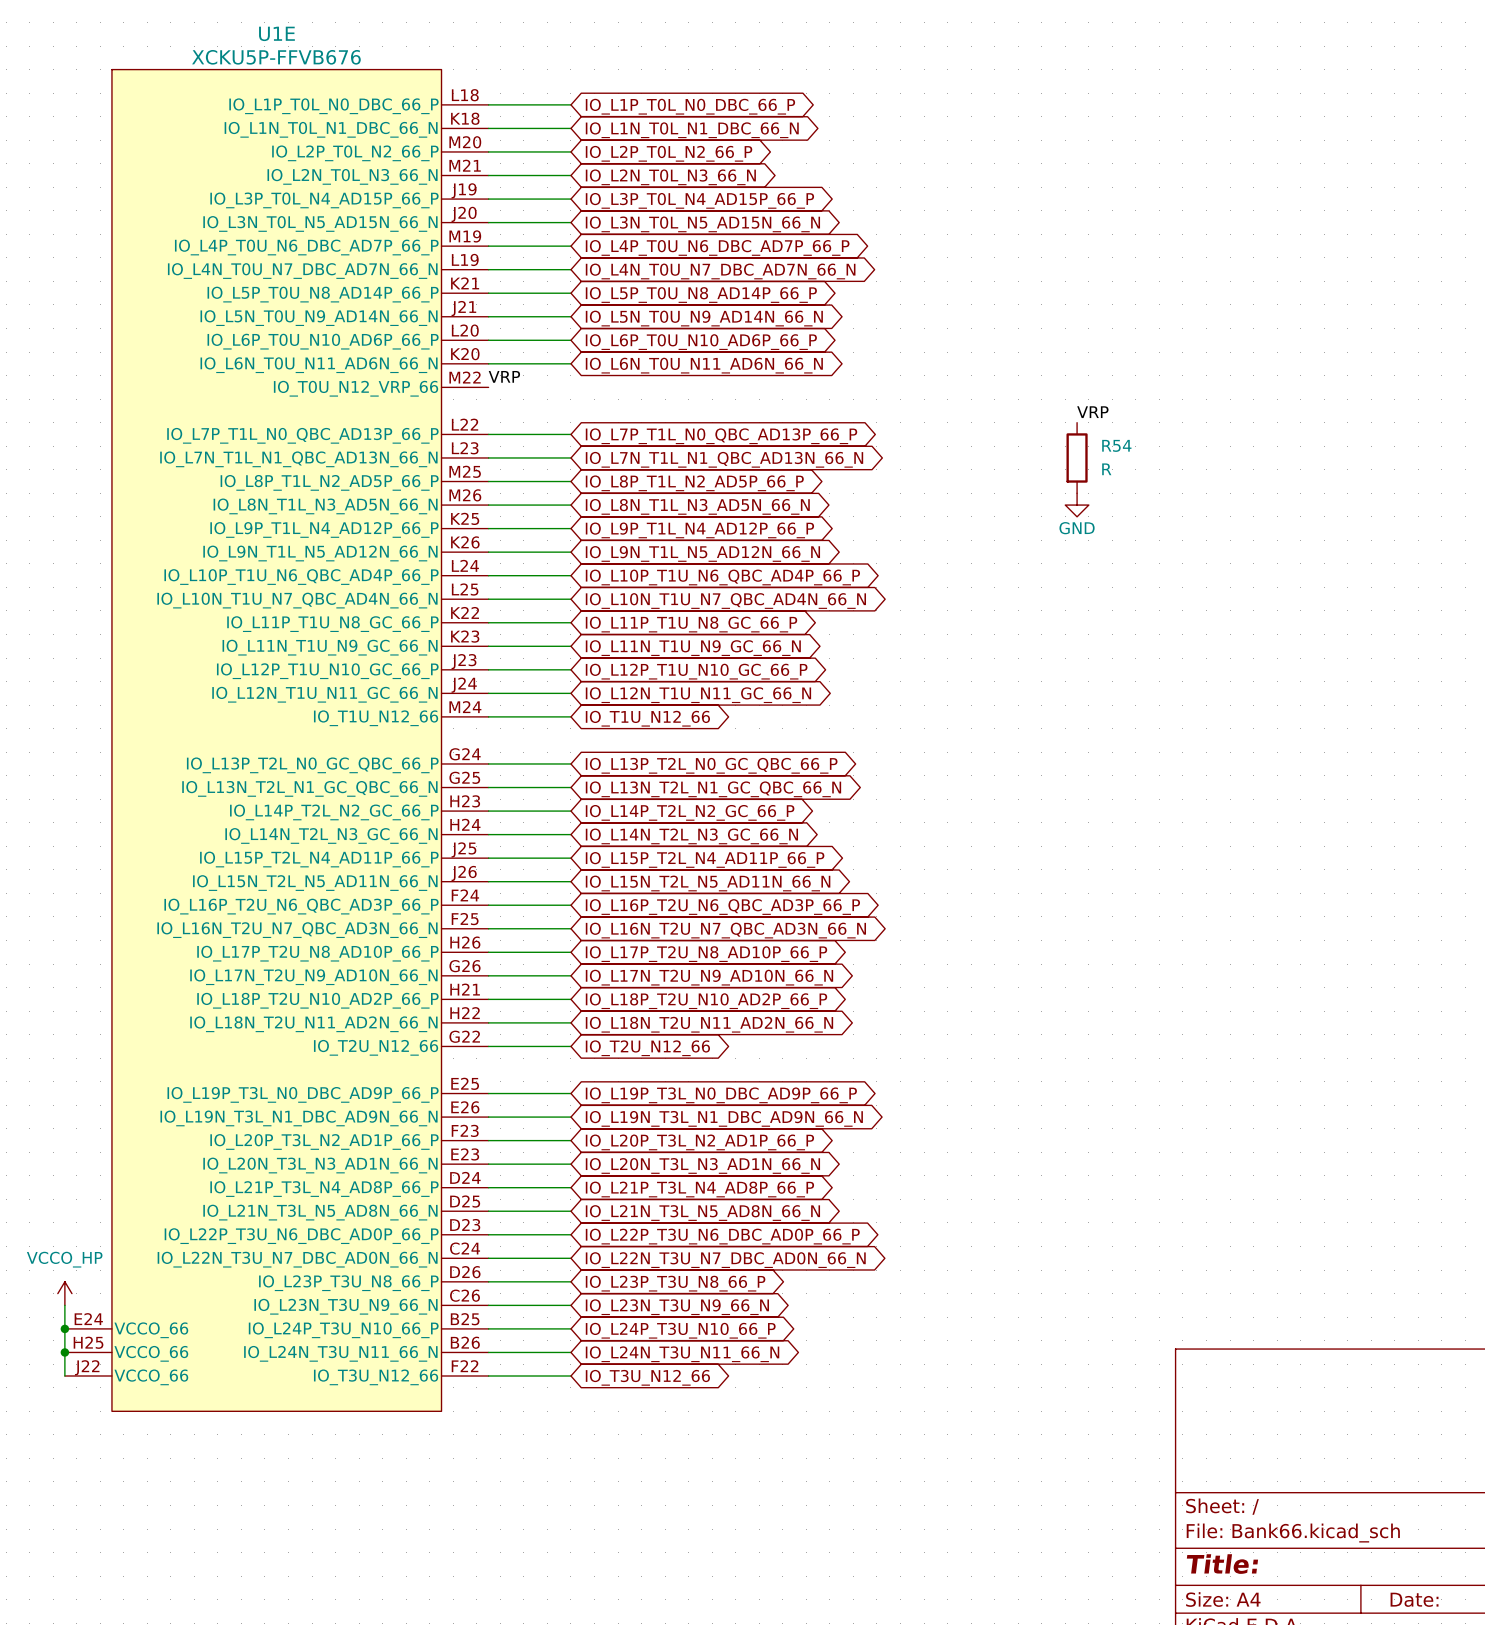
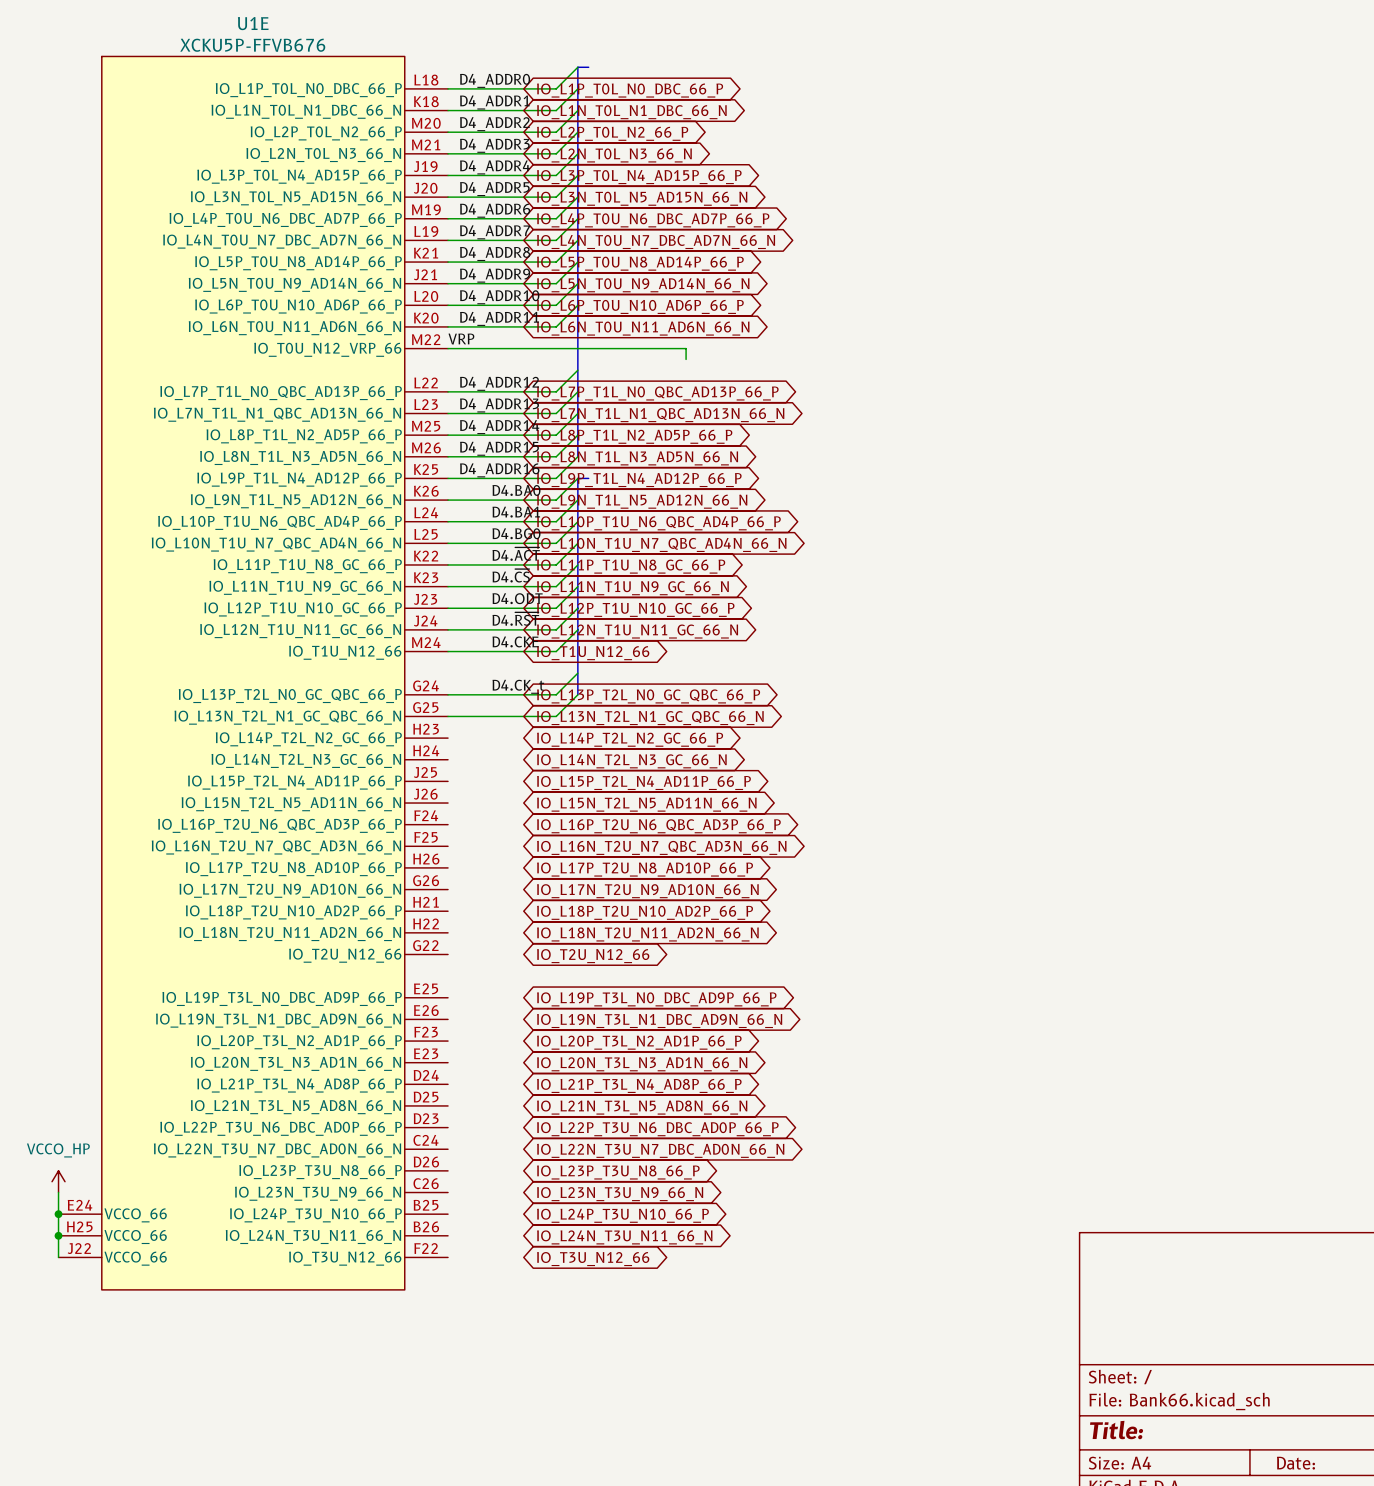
wire: none -> (577, 67) (556, 88) (523, 88)
bus: none -> (588, 67) (577, 67) (577, 456)
label: none -> D4_ADDR0 (495, 80)
wire: none -> (577, 88) (556, 110) (523, 110)
label: none -> D4_ADDR1 (494, 102)
wire: none -> (577, 110) (556, 132) (523, 132)
label: none -> D4_ADDR2 (494, 124)
wire: none -> (577, 132) (556, 153) (523, 153)
label: none -> D4_ADDR3 (494, 145)
wire: none -> (577, 153) (556, 175) (523, 175)
label: none -> D4_ADDR4 (495, 167)
wire: none -> (577, 175) (556, 197) (523, 197)
label: none -> D4_ADDR5 (494, 189)
wire: none -> (577, 197) (556, 218) (523, 218)
label: none -> D4_ADDR6 (495, 210)
wire: none -> (577, 218) (556, 240) (523, 240)
label: none -> D4_ADDR7 (495, 232)
wire: none -> (577, 240) (556, 262) (523, 262)
label: none -> D4_ADDR8 (495, 254)
wire: none -> (577, 262) (556, 283) (523, 283)
label: none -> D4_ADDR9 (495, 275)
wire: none -> (577, 283) (556, 305) (523, 305)
label: none -> D4_ADDR10 (499, 297)
wire: none -> (577, 305) (556, 326) (523, 326)
label: none -> D4_ADDR11 (499, 318)
wire: none -> (448, 348) (686, 348) (686, 359)
wire: none -> (577, 370) (556, 391) (523, 391)
label: VRP (1092, 412) -> none
label: none -> D4_ADDR12 (499, 383)
wire: none -> (577, 391) (556, 413) (523, 413)
label: none -> D4_ADDR13 (499, 405)
wire: none -> (577, 413) (556, 435) (523, 435)
R54: R (1077, 457) -> none
label: none -> D4_ADDR14 (499, 427)
wire: none -> (577, 435) (556, 456) (523, 456)
label: none -> D4_ADDR15 (499, 448)
wire: none -> (577, 456) (556, 478) (523, 478)
power symbol: GND (1077, 505) -> none
label: none -> D4_ADDR16 (499, 470)
wire: none -> (577, 478) (556, 500) (523, 500)
bus: none -> (588, 478) (577, 478) (577, 694)
label: none -> D4.BA0 (516, 490)
wire: none -> (577, 500) (556, 521) (523, 521)
label: none -> D4.BA1 (516, 512)
wire: none -> (577, 521) (556, 543) (523, 543)
label: none -> D4.BG0 (516, 533)
wire: none -> (577, 543) (556, 564) (523, 564)
label: none -> D4.~{ACT} (516, 554)
wire: none -> (577, 564) (556, 586) (523, 586)
label: none -> D4.~{CS} (511, 575)
wire: none -> (577, 586) (556, 608) (523, 608)
label: none -> D4.ODT (517, 598)
wire: none -> (577, 608) (556, 629) (523, 629)
label: none -> D4.~{RST} (515, 619)
wire: none -> (577, 629) (556, 651) (523, 651)
label: none -> D4.CKE (515, 641)
wire: none -> (577, 673) (556, 694) (523, 694)
label: none -> D4.CK_t (518, 686)
wire: none -> (577, 694) (556, 716) (523, 716)
wire: (488, 811) (570, 811) -> none
wire: (488, 834) (570, 834) -> none
wire: (488, 858) (570, 858) -> none
wire: (488, 881) (570, 881) -> none
wire: (488, 905) (570, 905) -> none
wire: (488, 928) (570, 928) -> none
wire: (488, 952) (570, 952) -> none
wire: (488, 975) (570, 975) -> none
wire: (488, 999) (570, 999) -> none
wire: (488, 1022) (570, 1022) -> none
wire: (488, 1046) (570, 1046) -> none
wire: (488, 1093) (570, 1093) -> none
wire: (488, 1117) (570, 1117) -> none
wire: (488, 1140) (570, 1140) -> none
wire: (488, 1164) (570, 1164) -> none
wire: (488, 1187) (570, 1187) -> none
wire: (488, 1211) (570, 1211) -> none
wire: (488, 1234) (570, 1234) -> none
wire: (488, 1258) (570, 1258) -> none
wire: (488, 1281) (570, 1281) -> none
wire: (488, 1305) (570, 1305) -> none
wire: (488, 1328) (570, 1328) -> none
wire: (488, 1352) (570, 1352) -> none
wire: (488, 1376) (570, 1376) -> none

